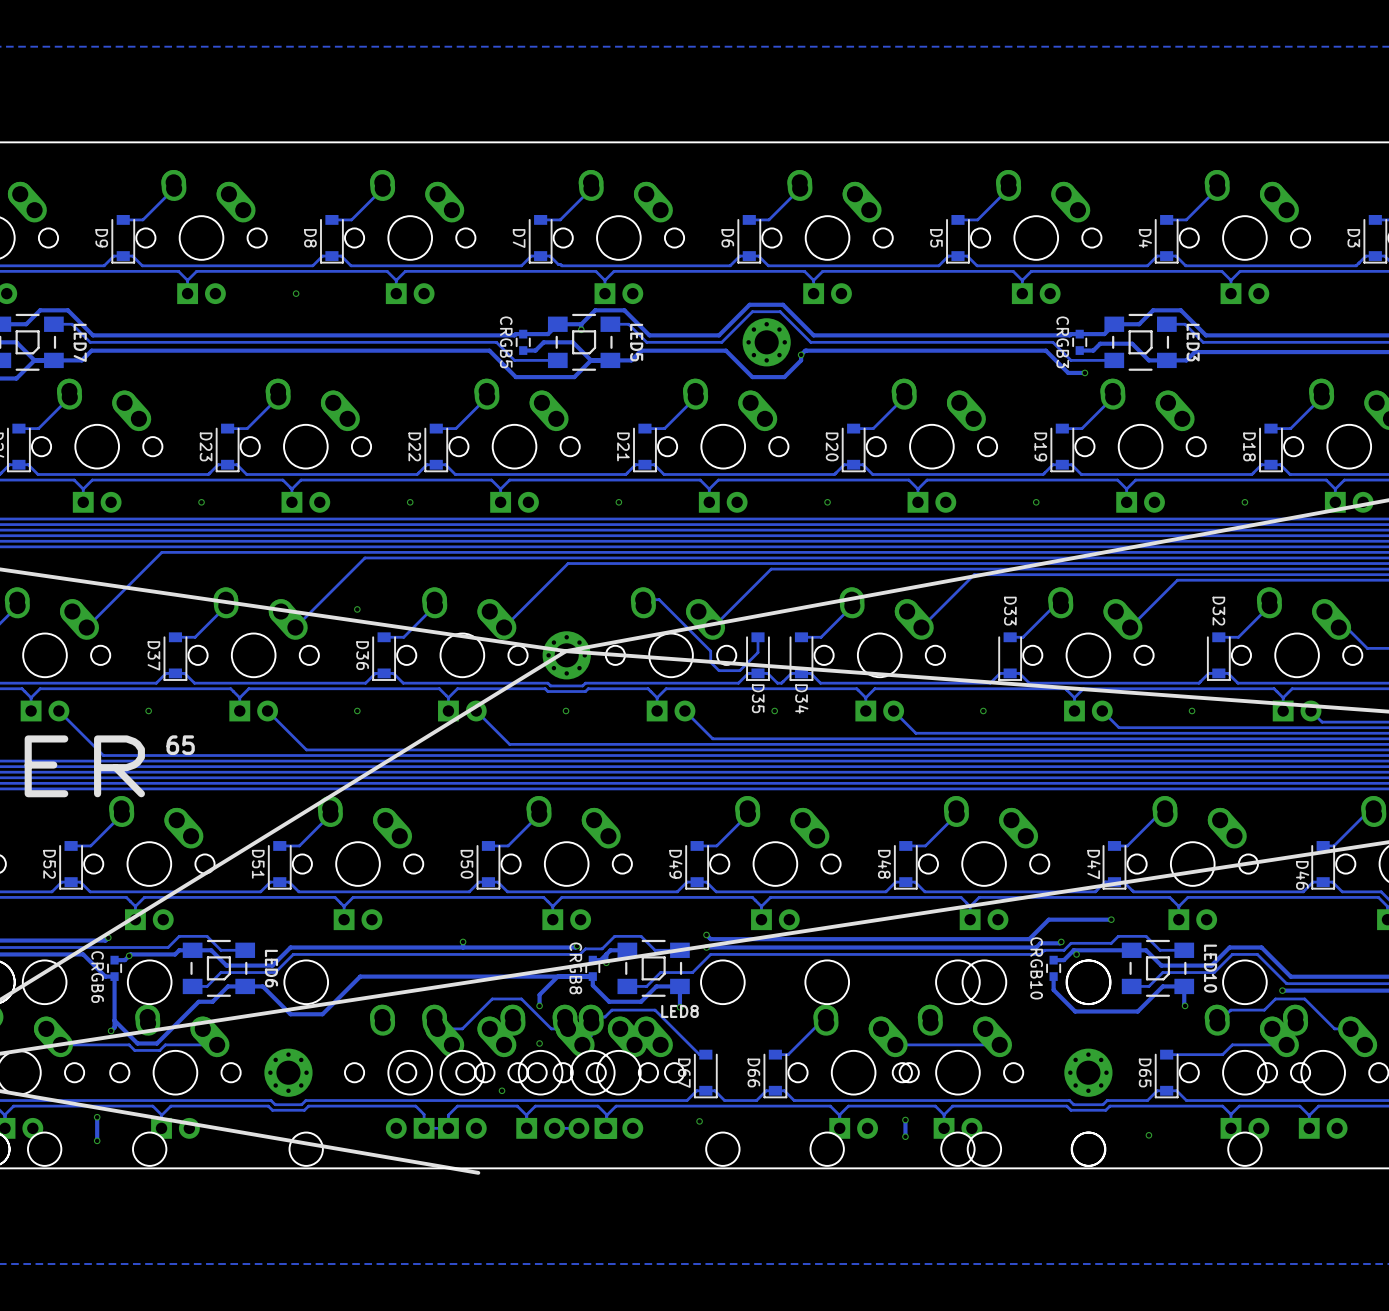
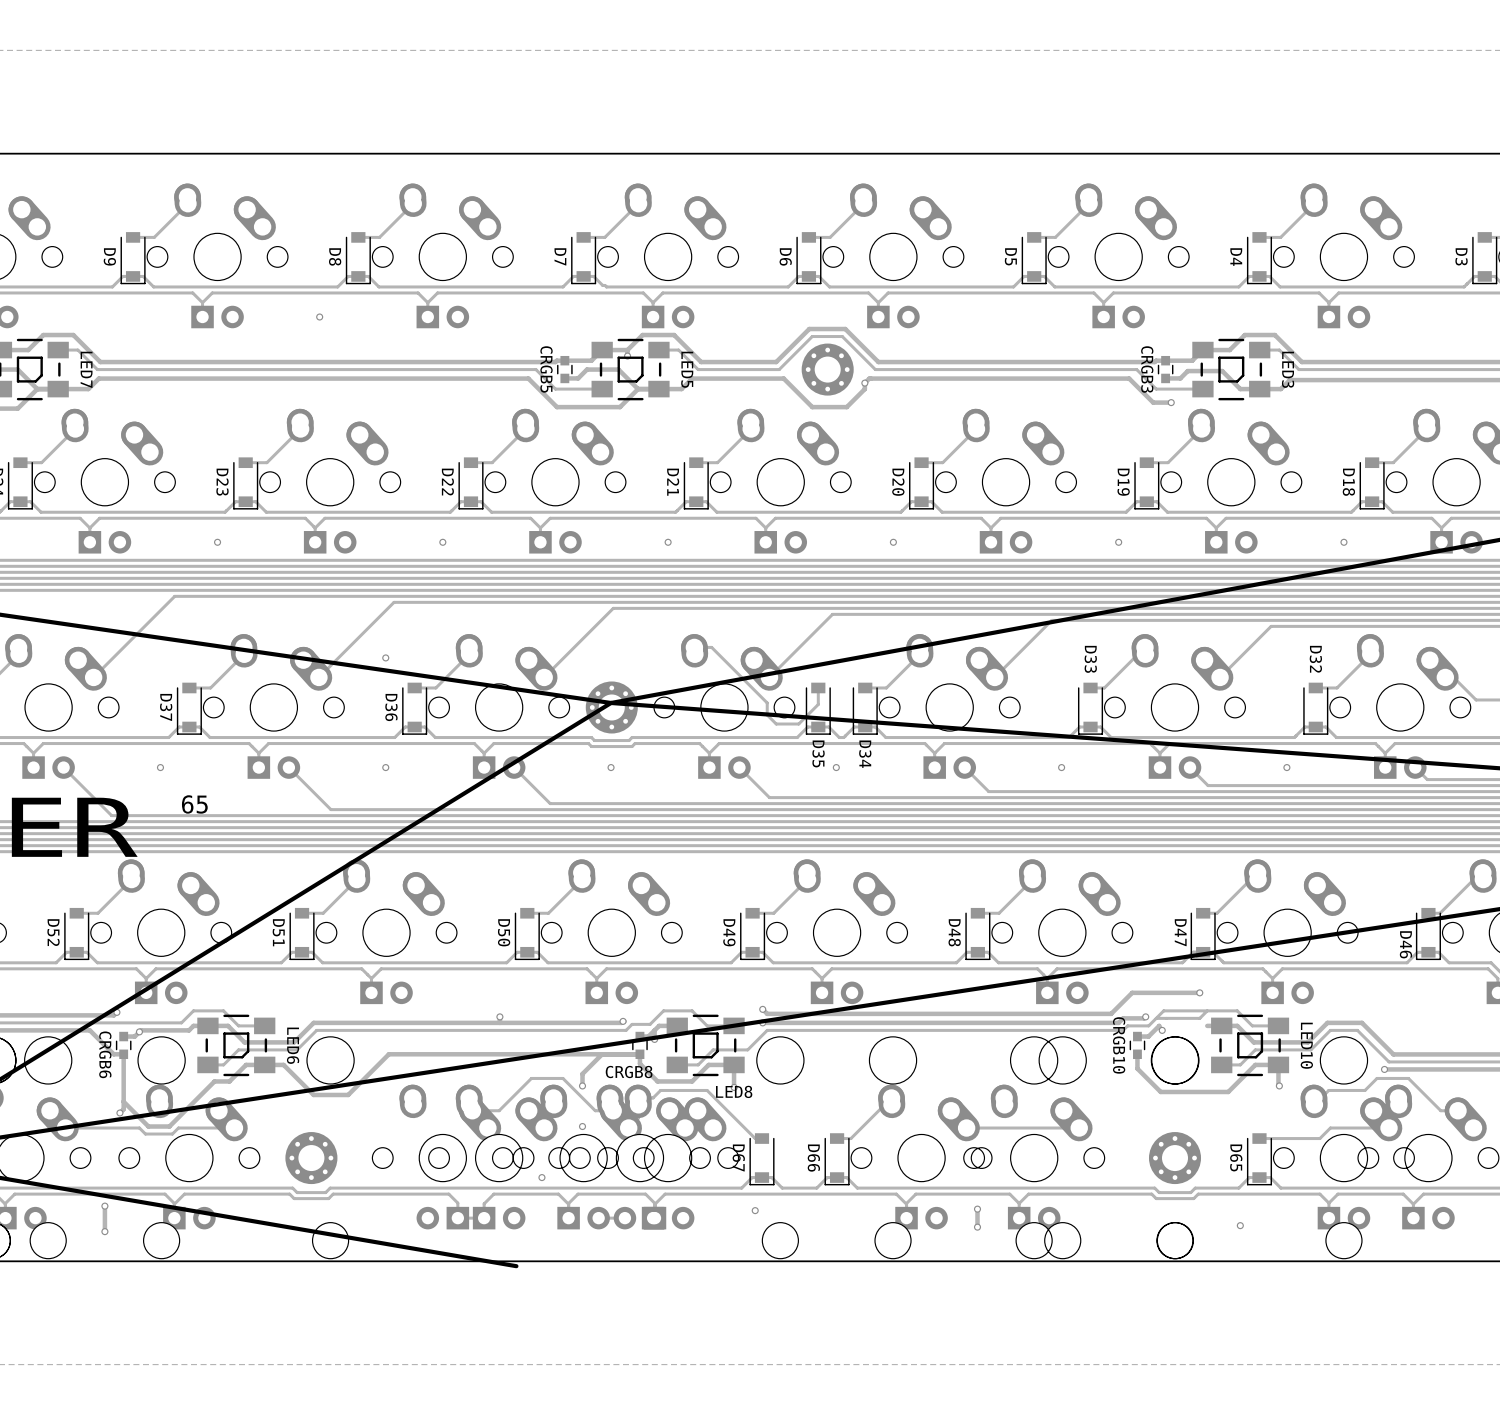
track: none -> (1207, 1010) (1163, 1010) (1156, 1018)
track: (1118, 950) (1073, 950) -> none
CRGB8 name rotation: 0° (575, 968) -> 90° counterclockwise (629, 1072)

